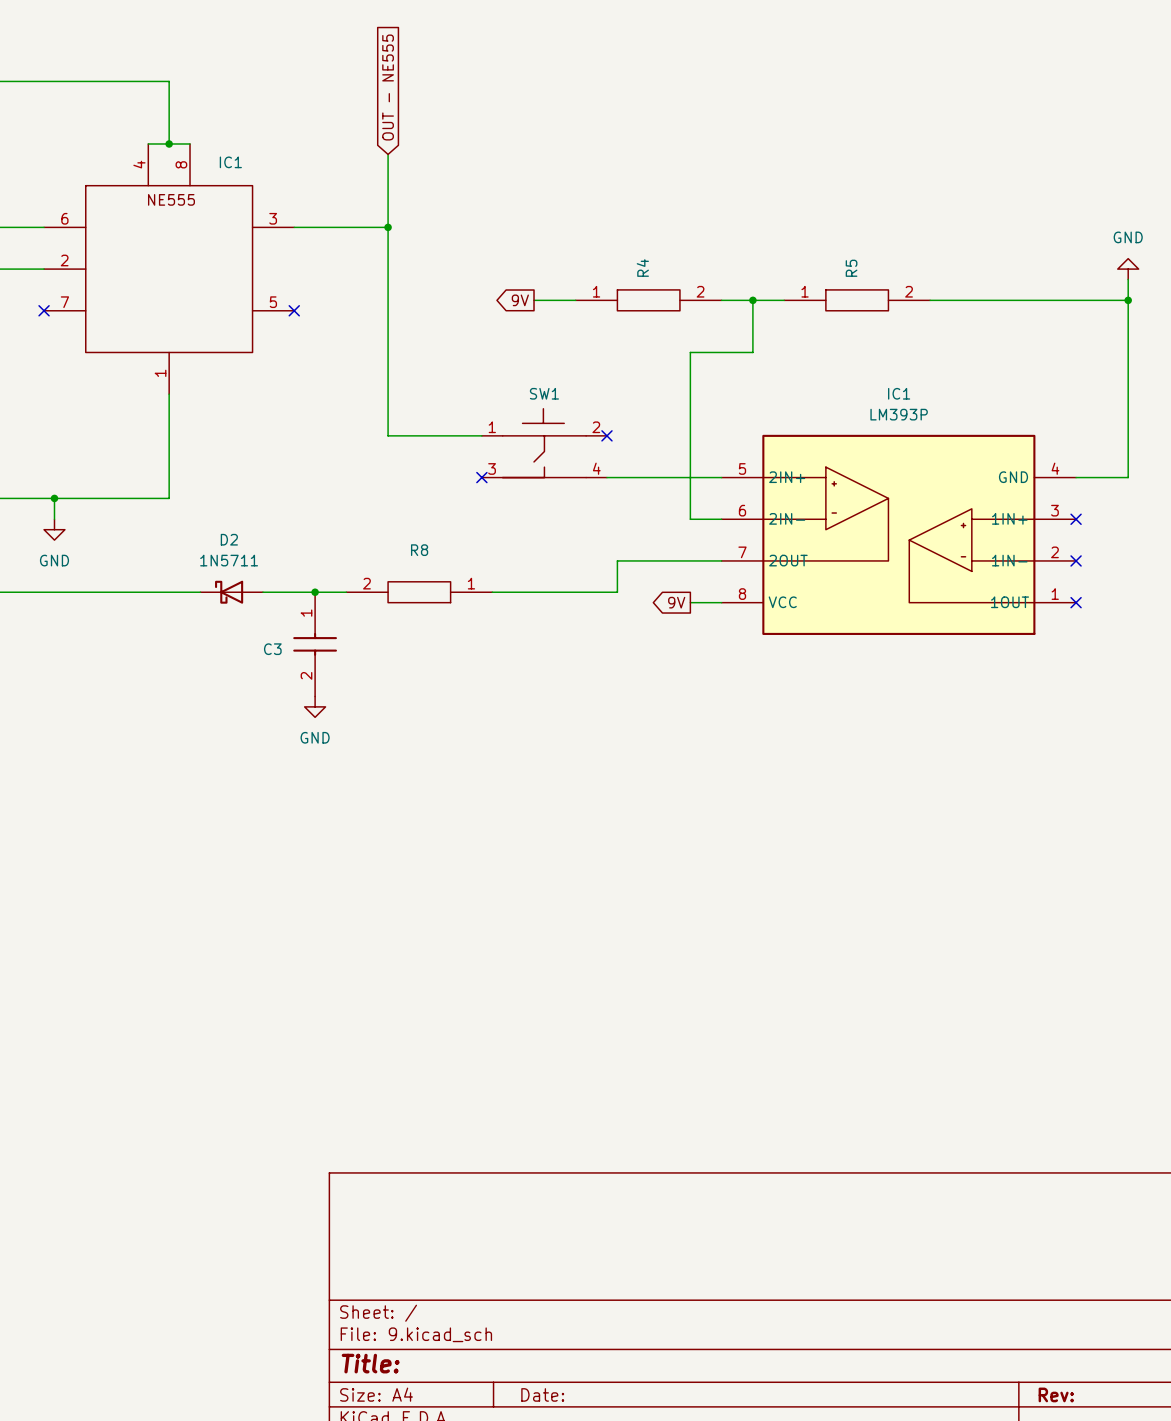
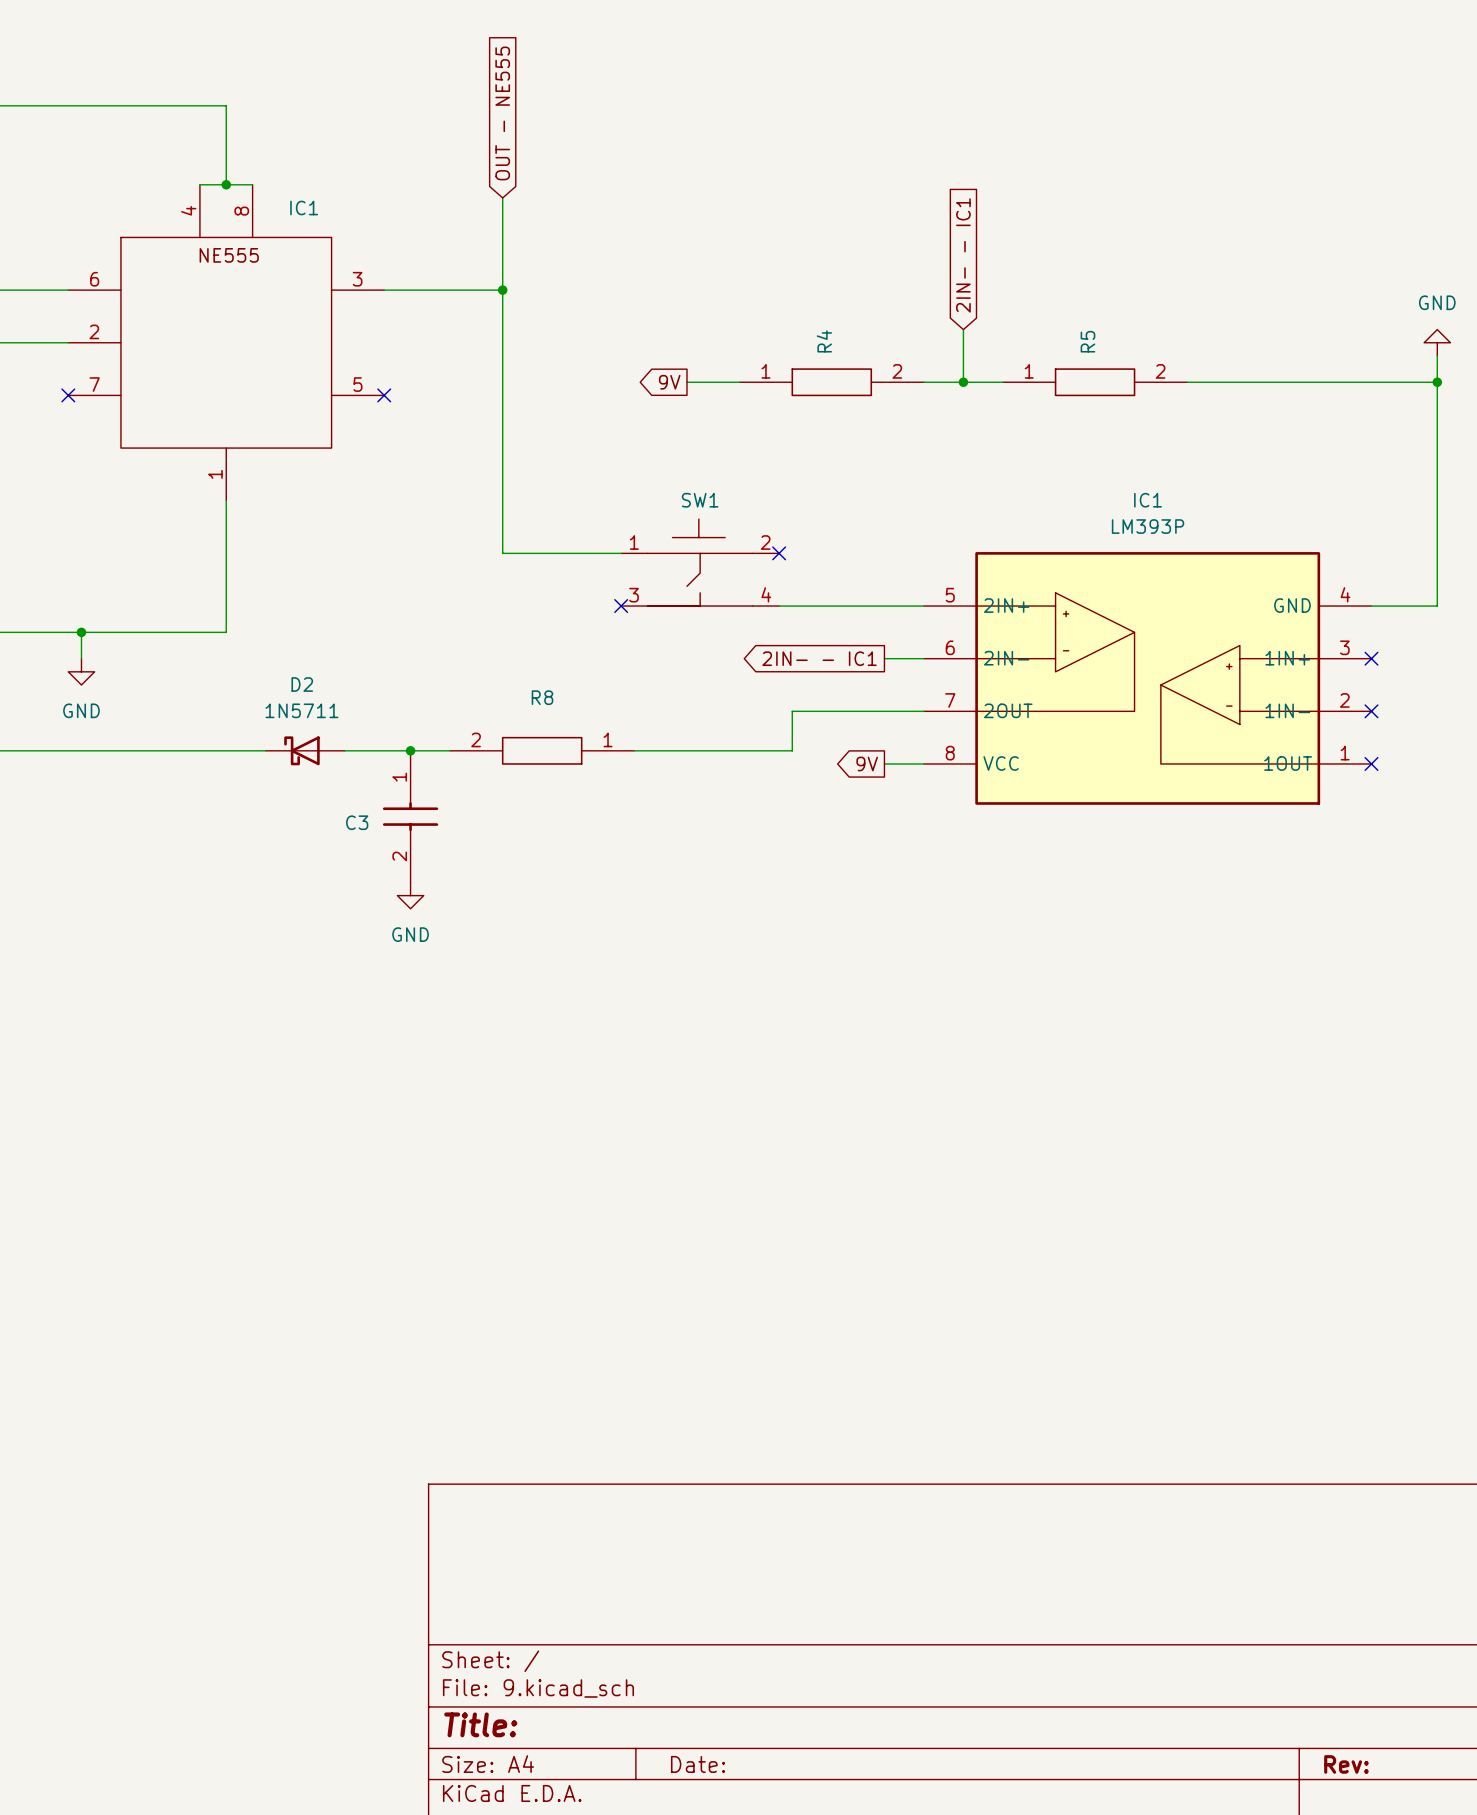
global label: none -> 2IN- - IC1 (963, 255)
wire: (752, 300) (752, 352) (690, 352) (690, 519) -> (963, 382) (963, 329)
global label: none -> 2IN- - IC1 (819, 658)

